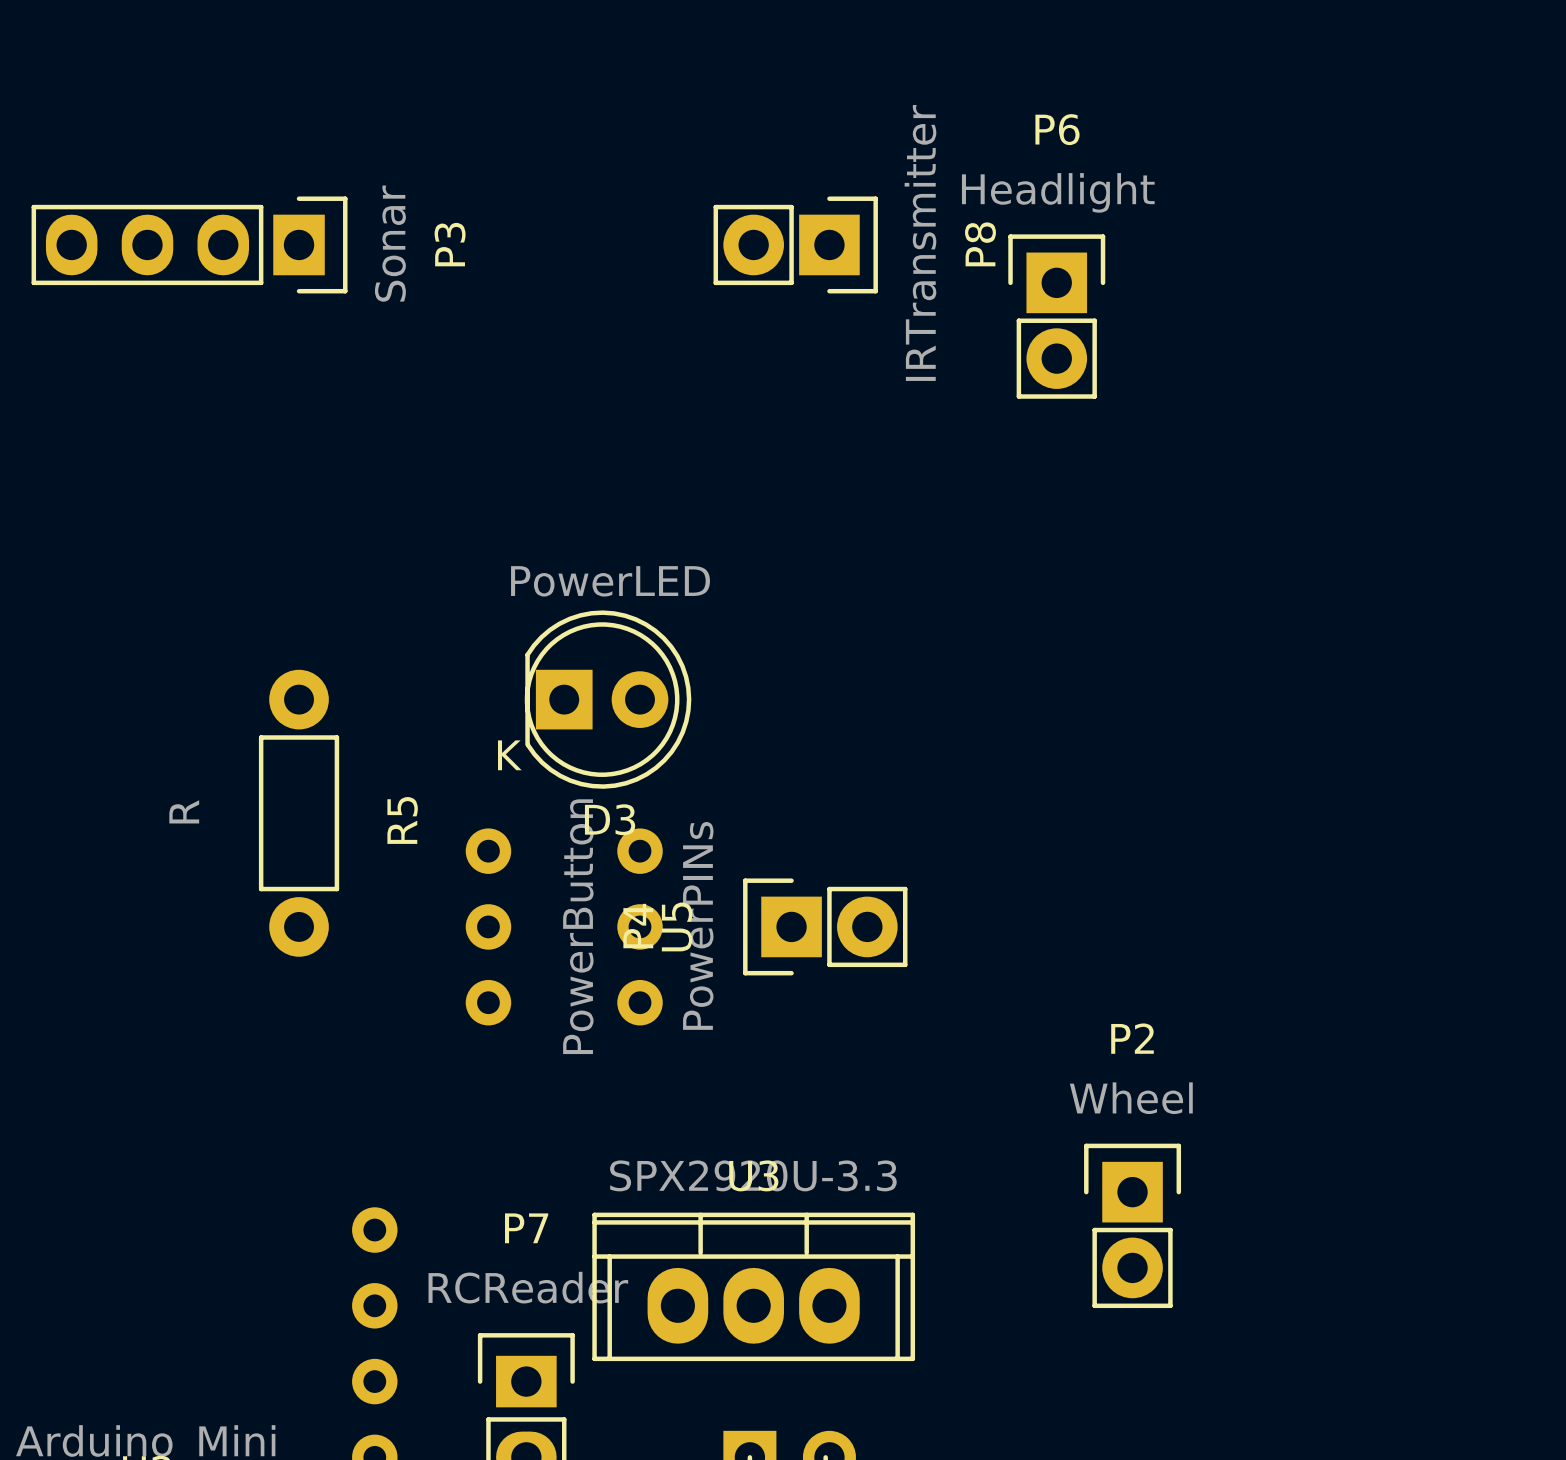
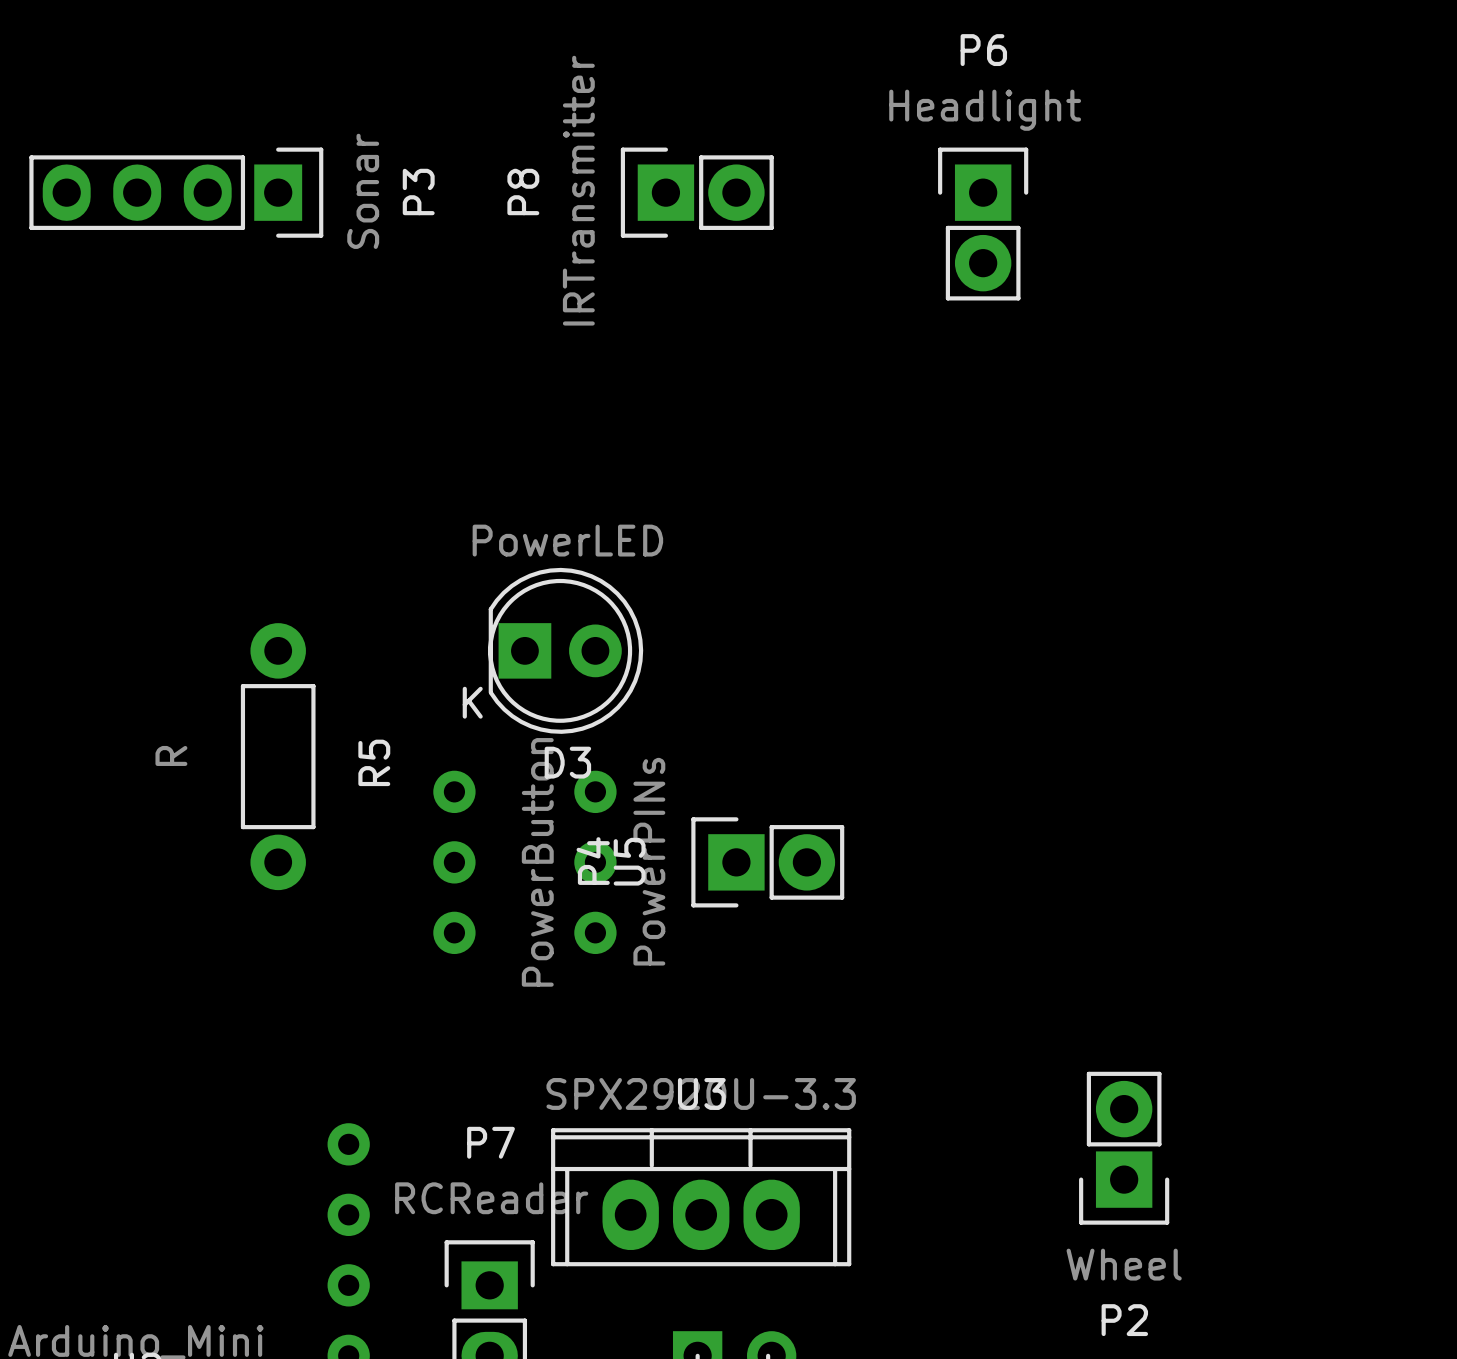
P3 position: (189, 244) -> (176, 192)
P8 rotation: 0° (795, 244) -> 180° (697, 192)
P6 position: (1056, 316) -> (983, 224)
P2 rotation: 0° (1132, 1225) -> 180° (1124, 1148)

